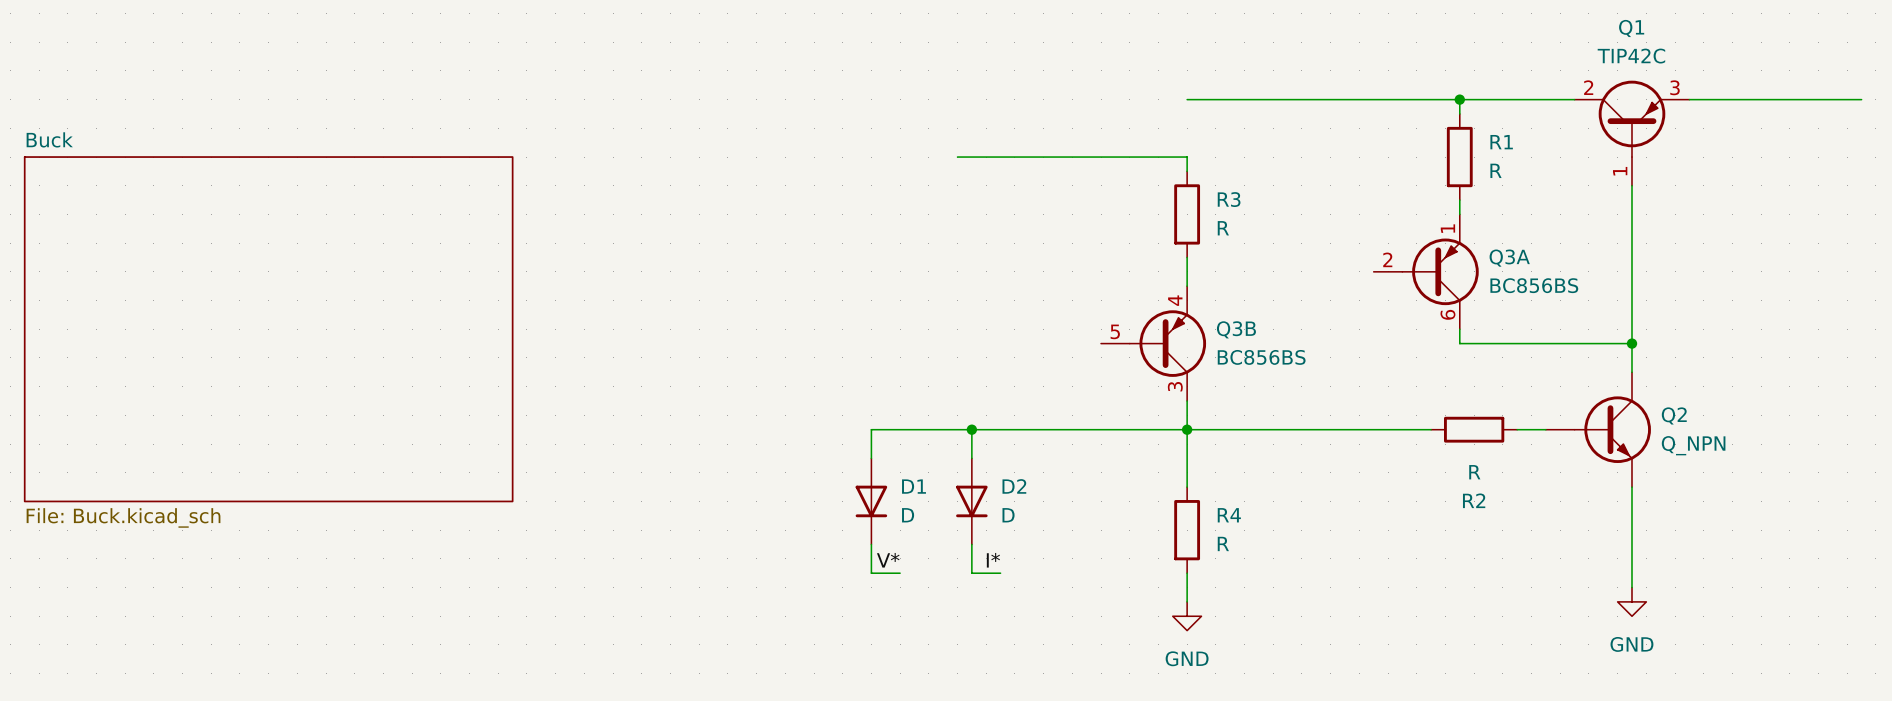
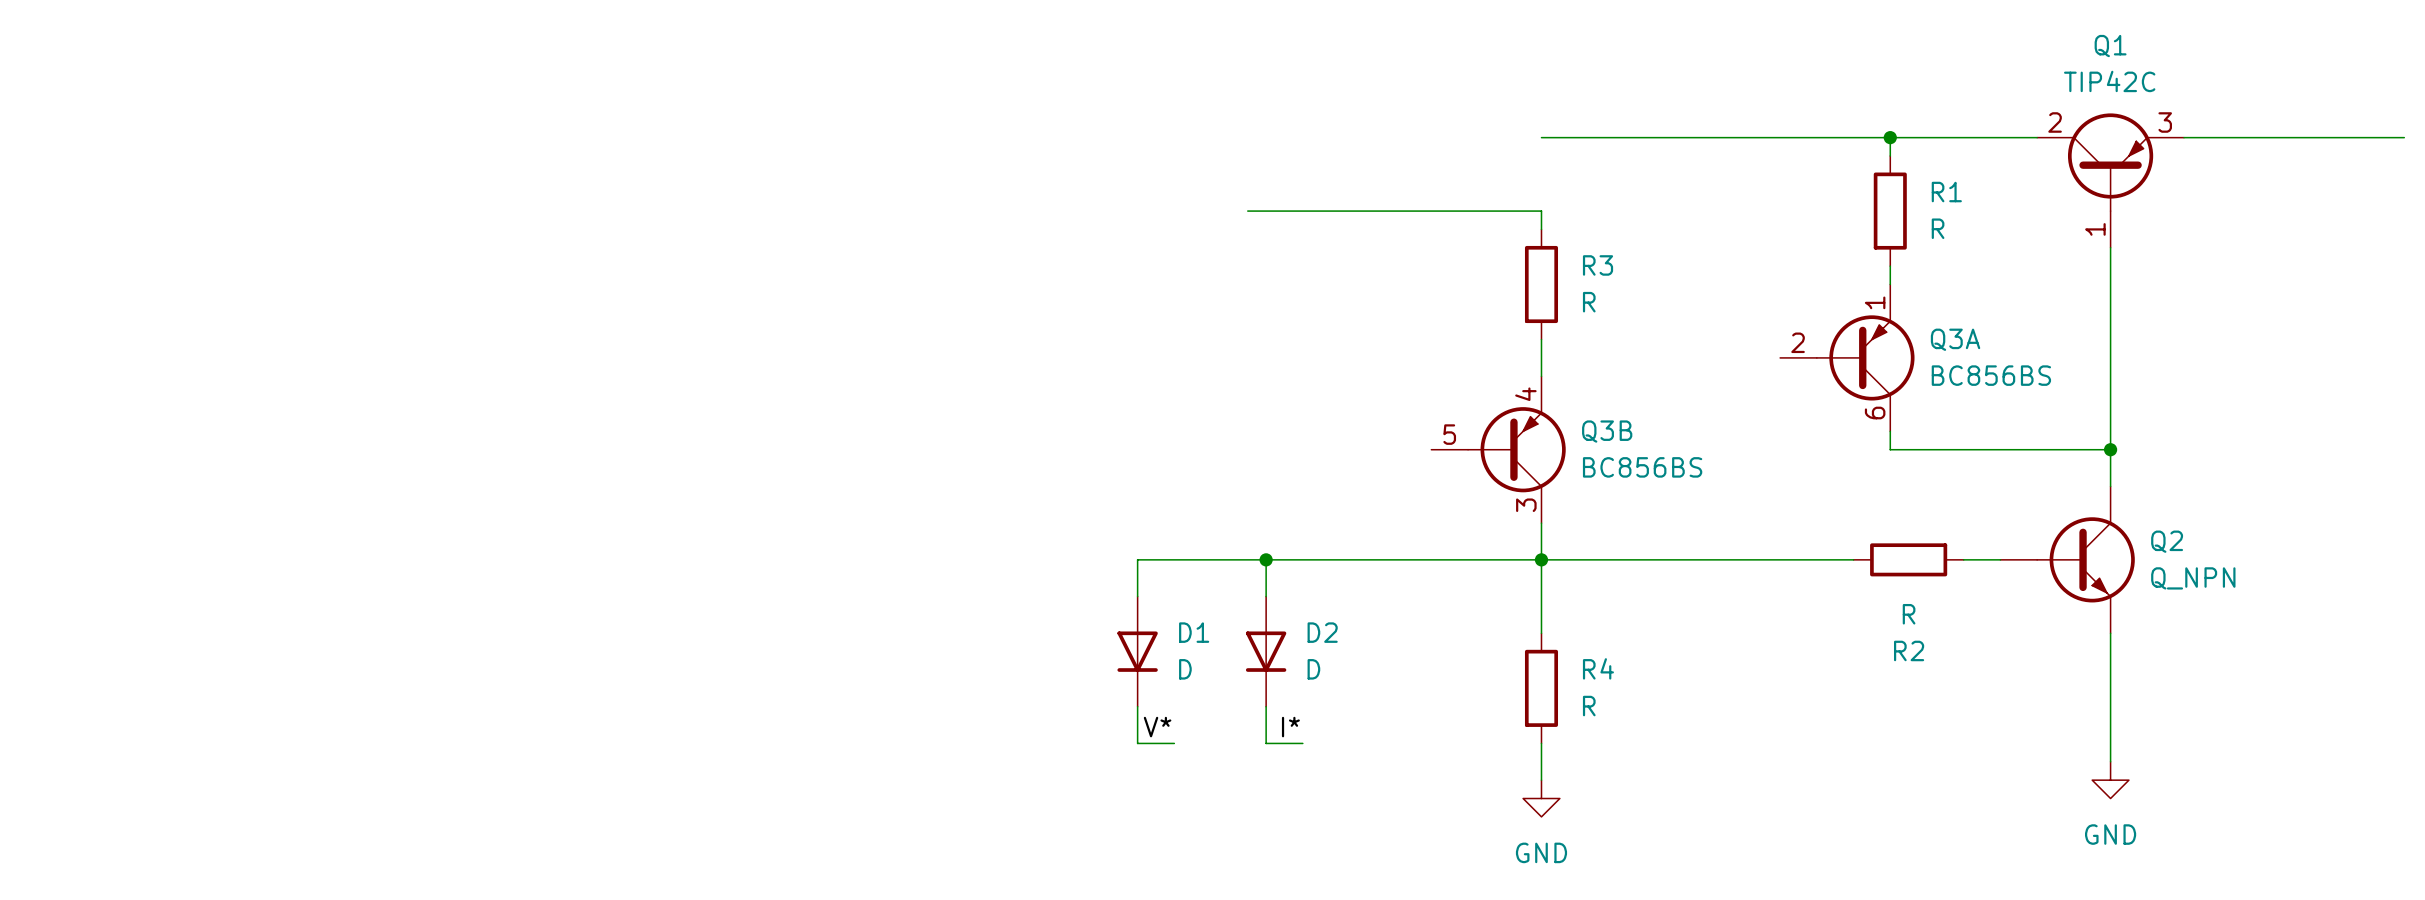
sheet Buck: File: Buck.kicad_sch (268, 329) -> none

